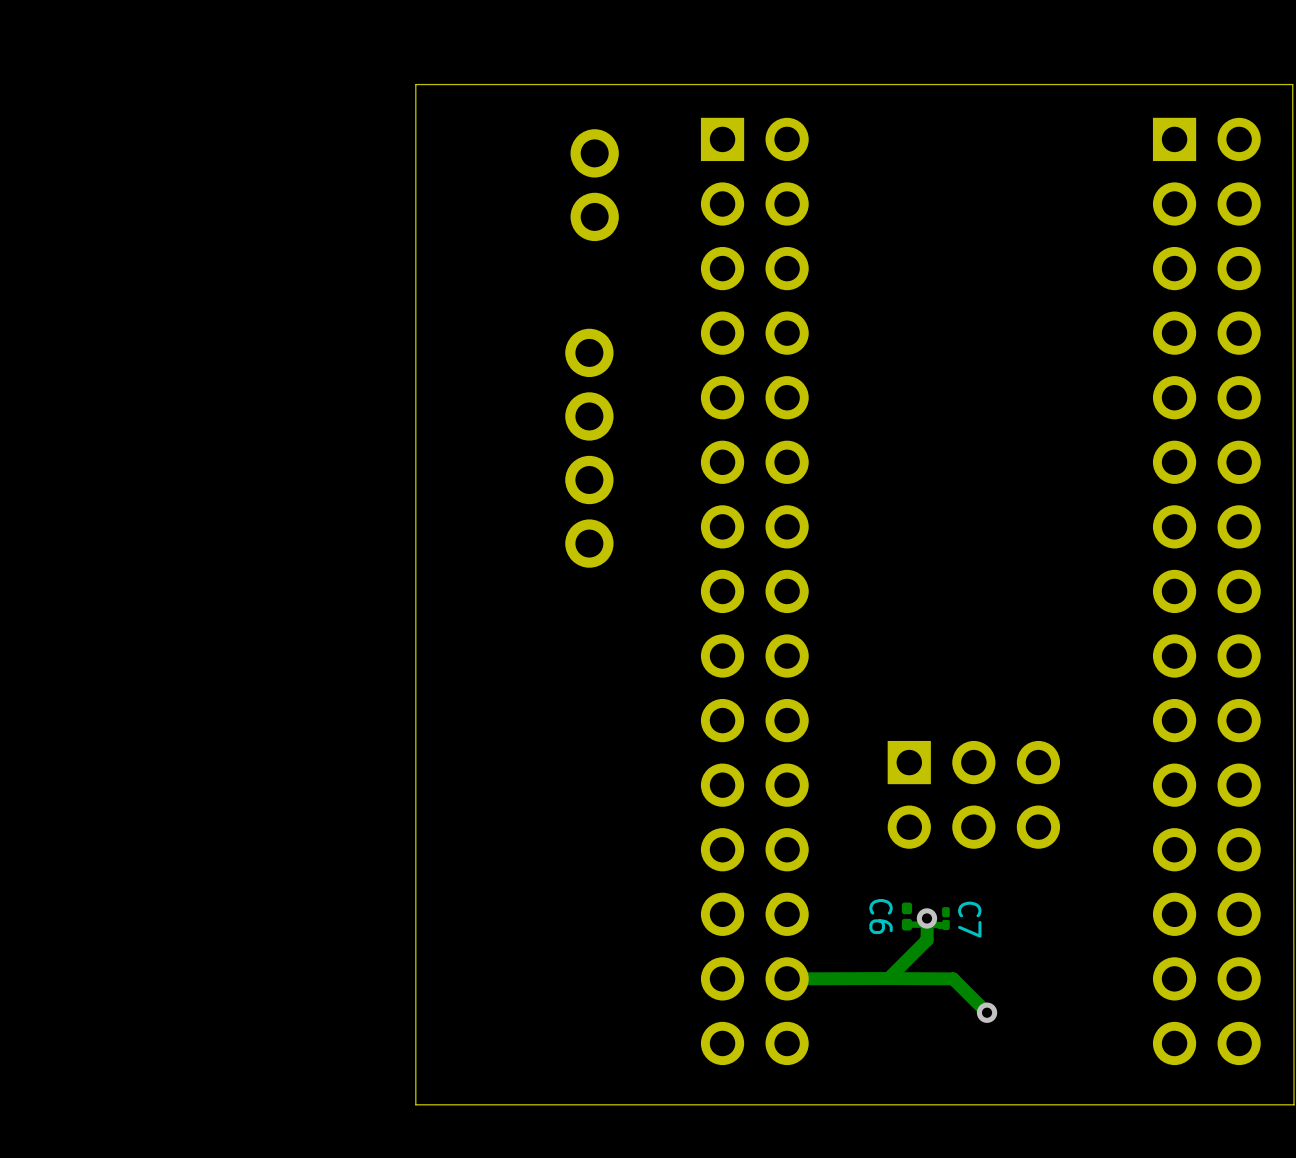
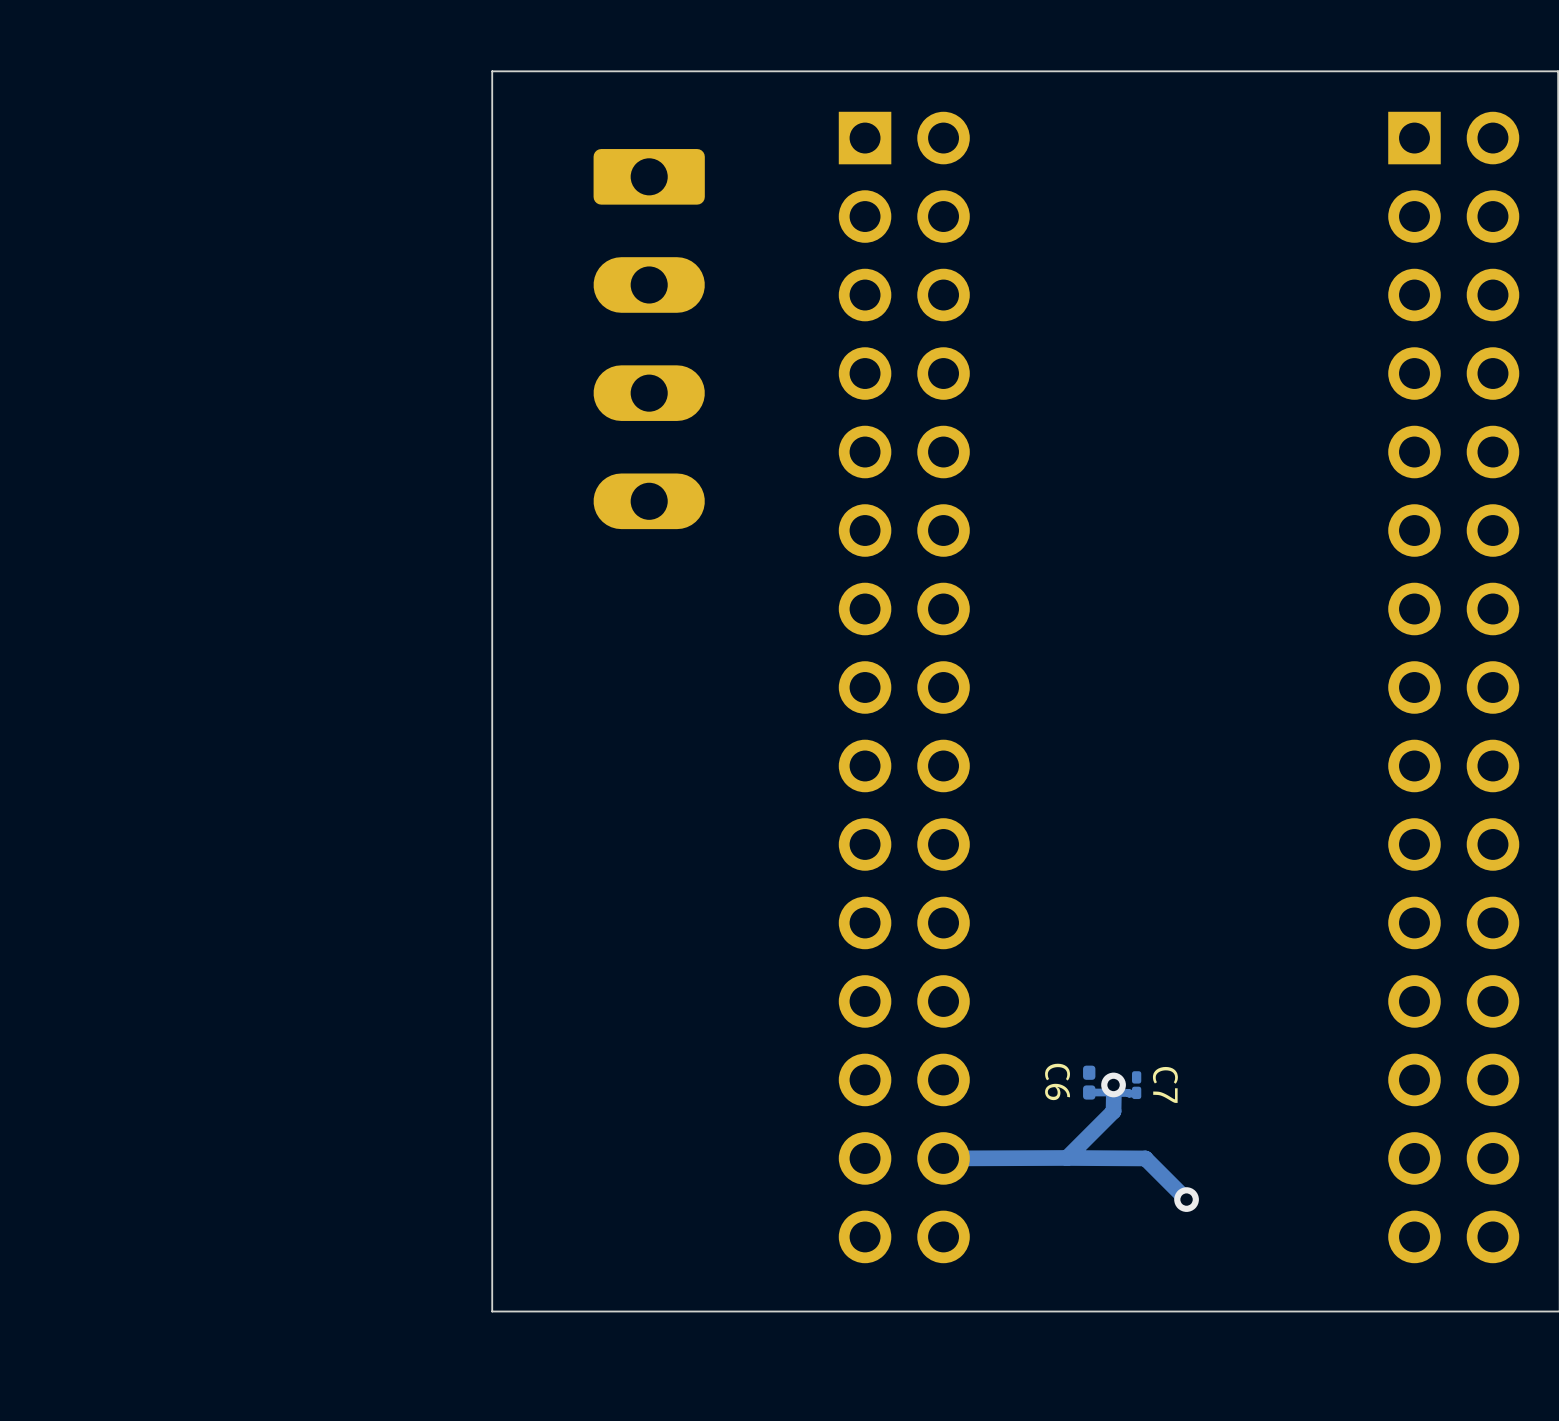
part: (594, 185) -> none
part: none -> (649, 339)
part: (589, 448) -> none
part: (973, 794) -> none

